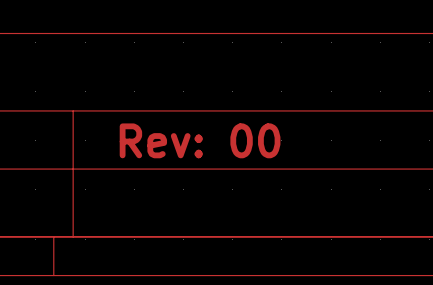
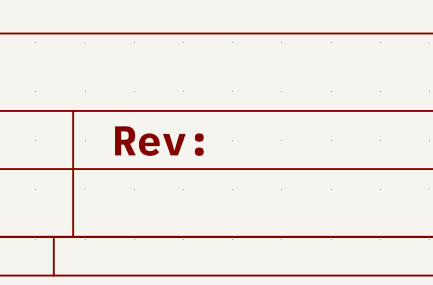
title block: Rev: 00 (200, 140) -> Rev: (159, 141)

